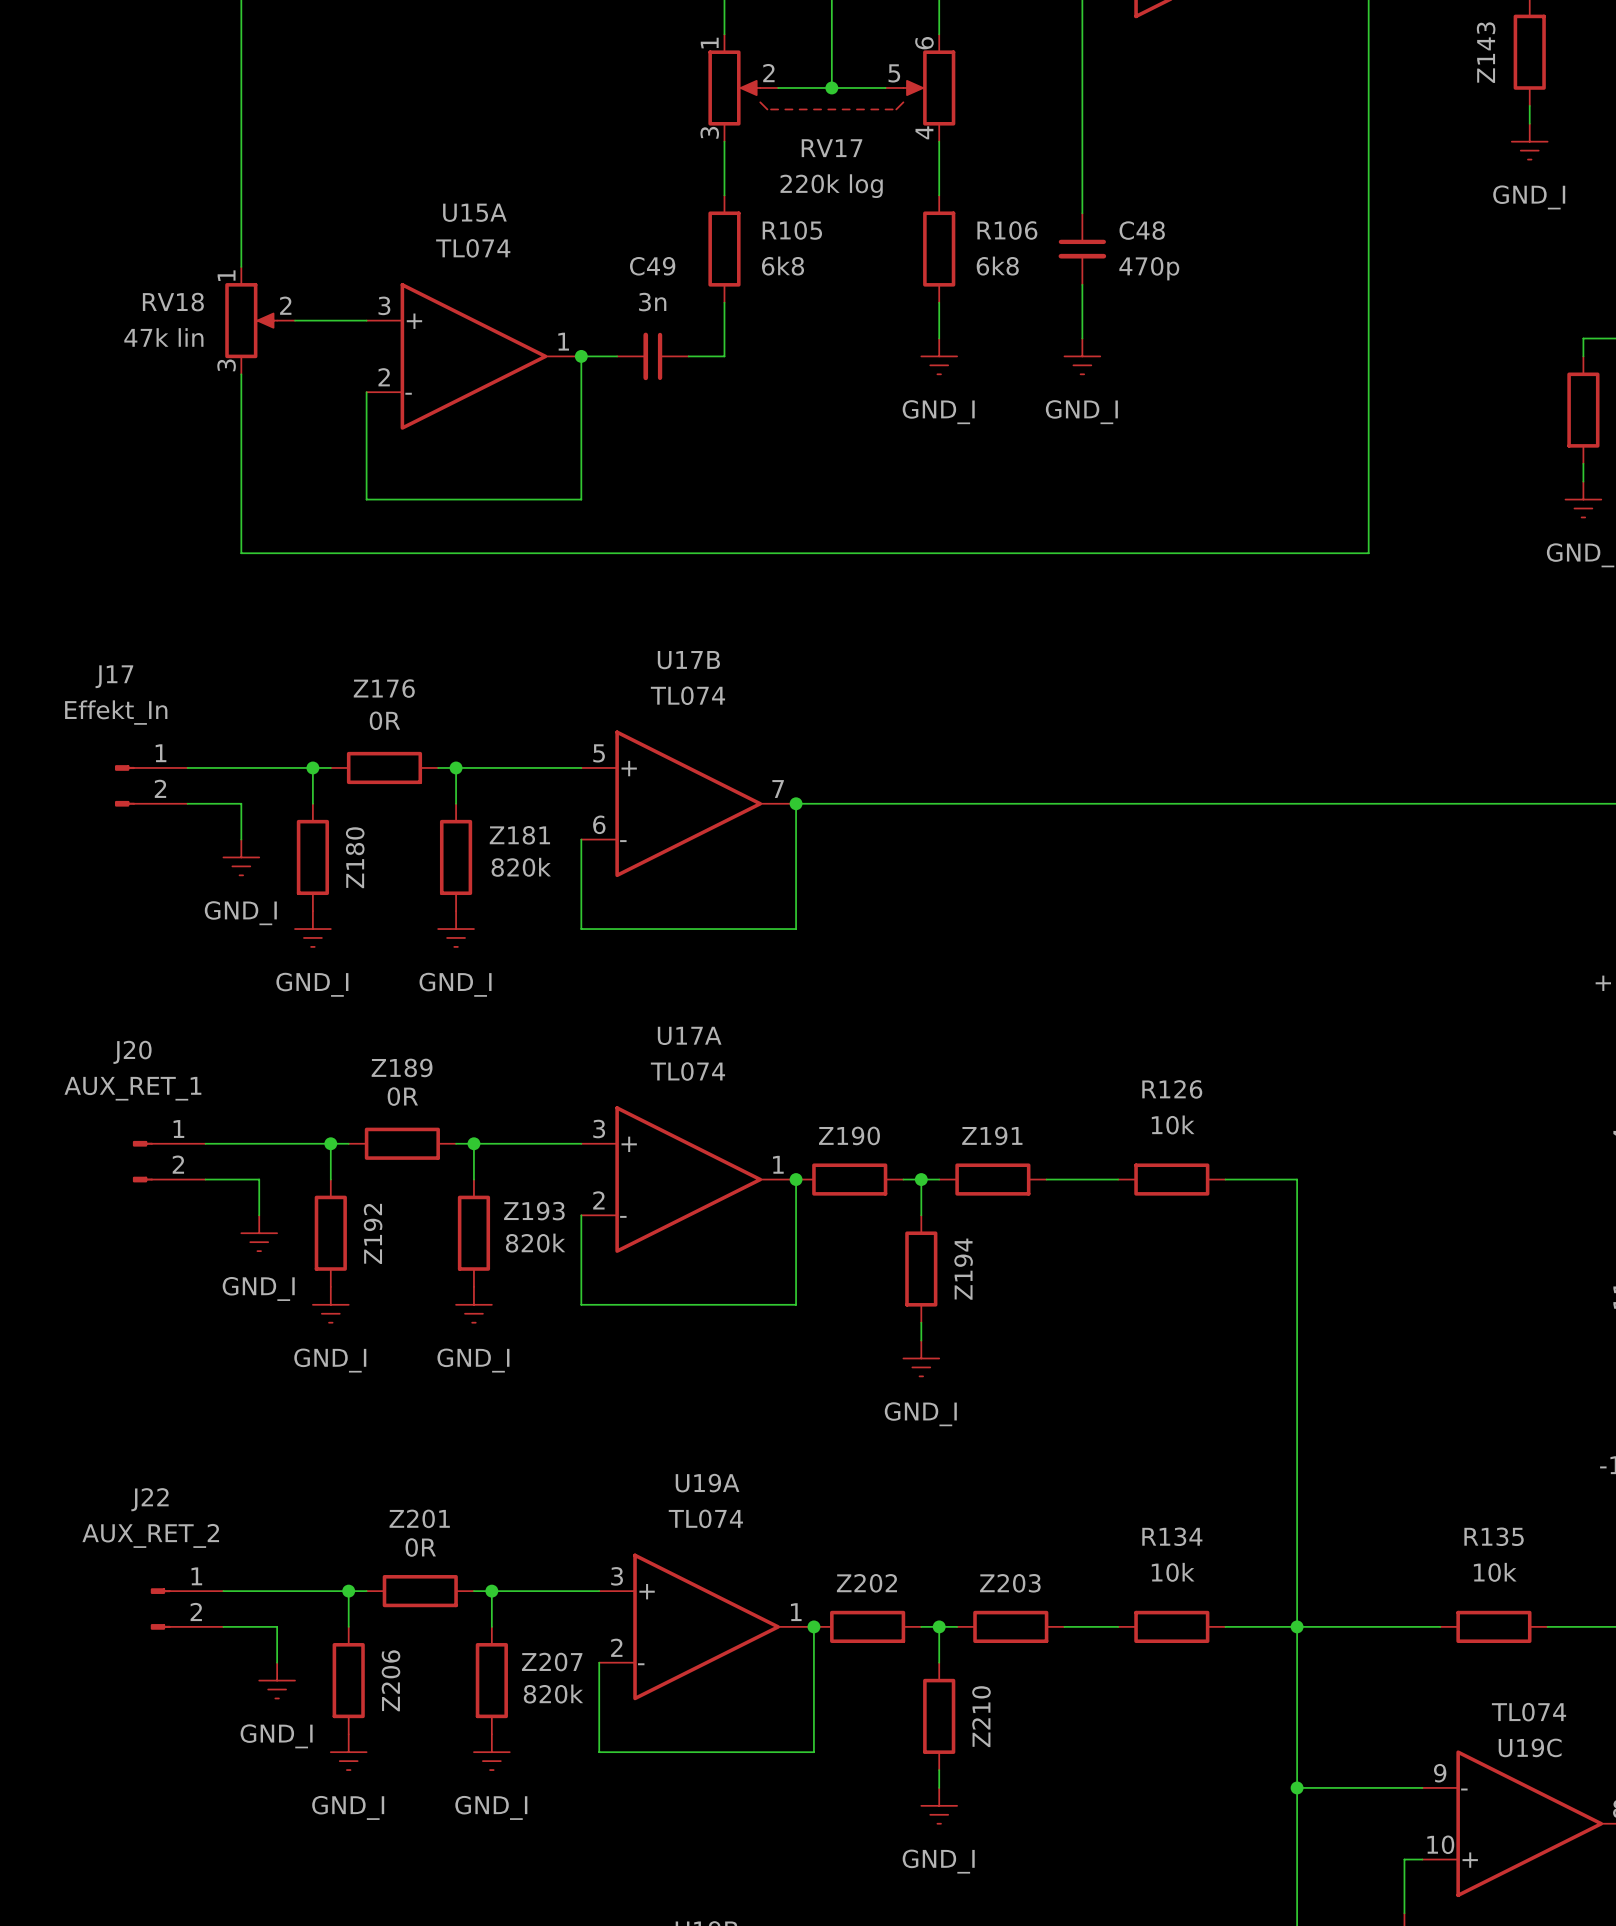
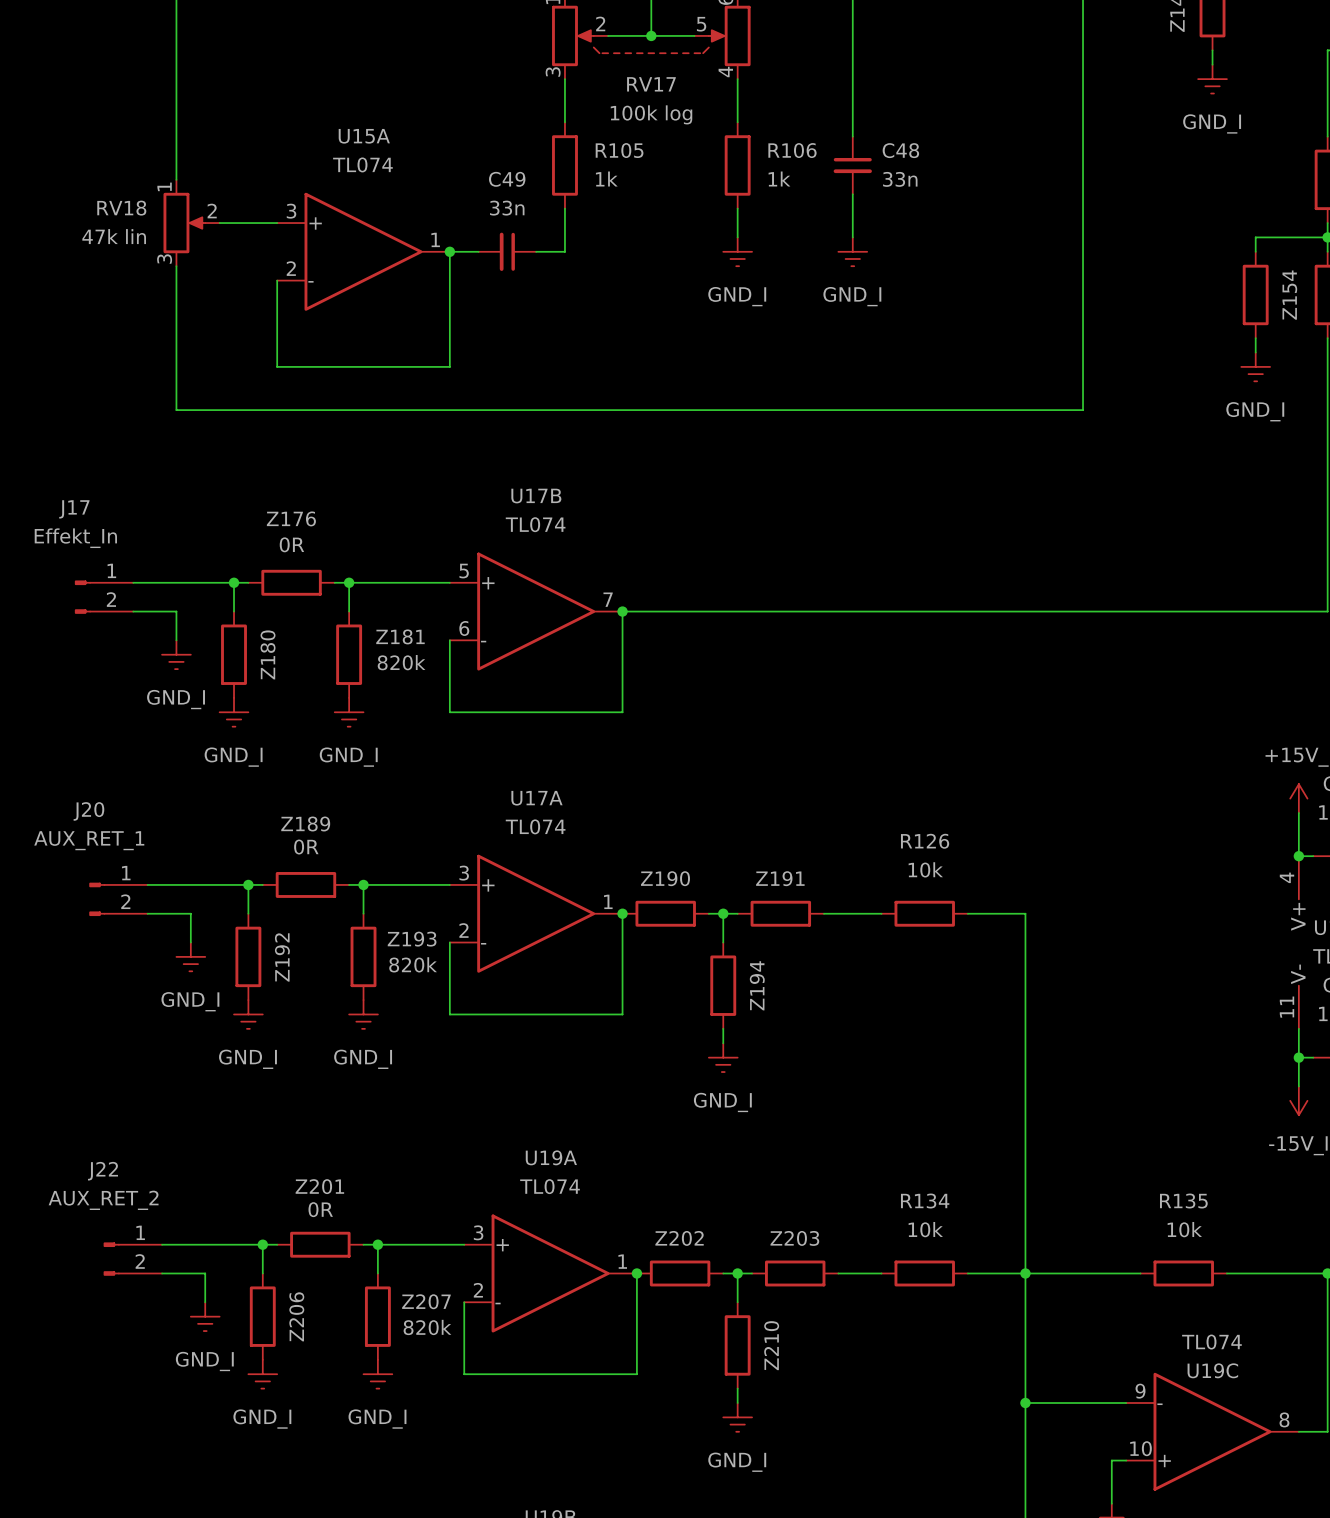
RV17 value: 220k log (831, 186) -> 100k log (651, 114)
R105 value: 6k8 (783, 266) -> 1k (606, 179)
R106 value: 6k8 (997, 266) -> 1k (779, 179)
C48 value: 470p (1149, 268) -> 33n (900, 179)
C49 value: 3n (652, 302) -> 33n (507, 208)

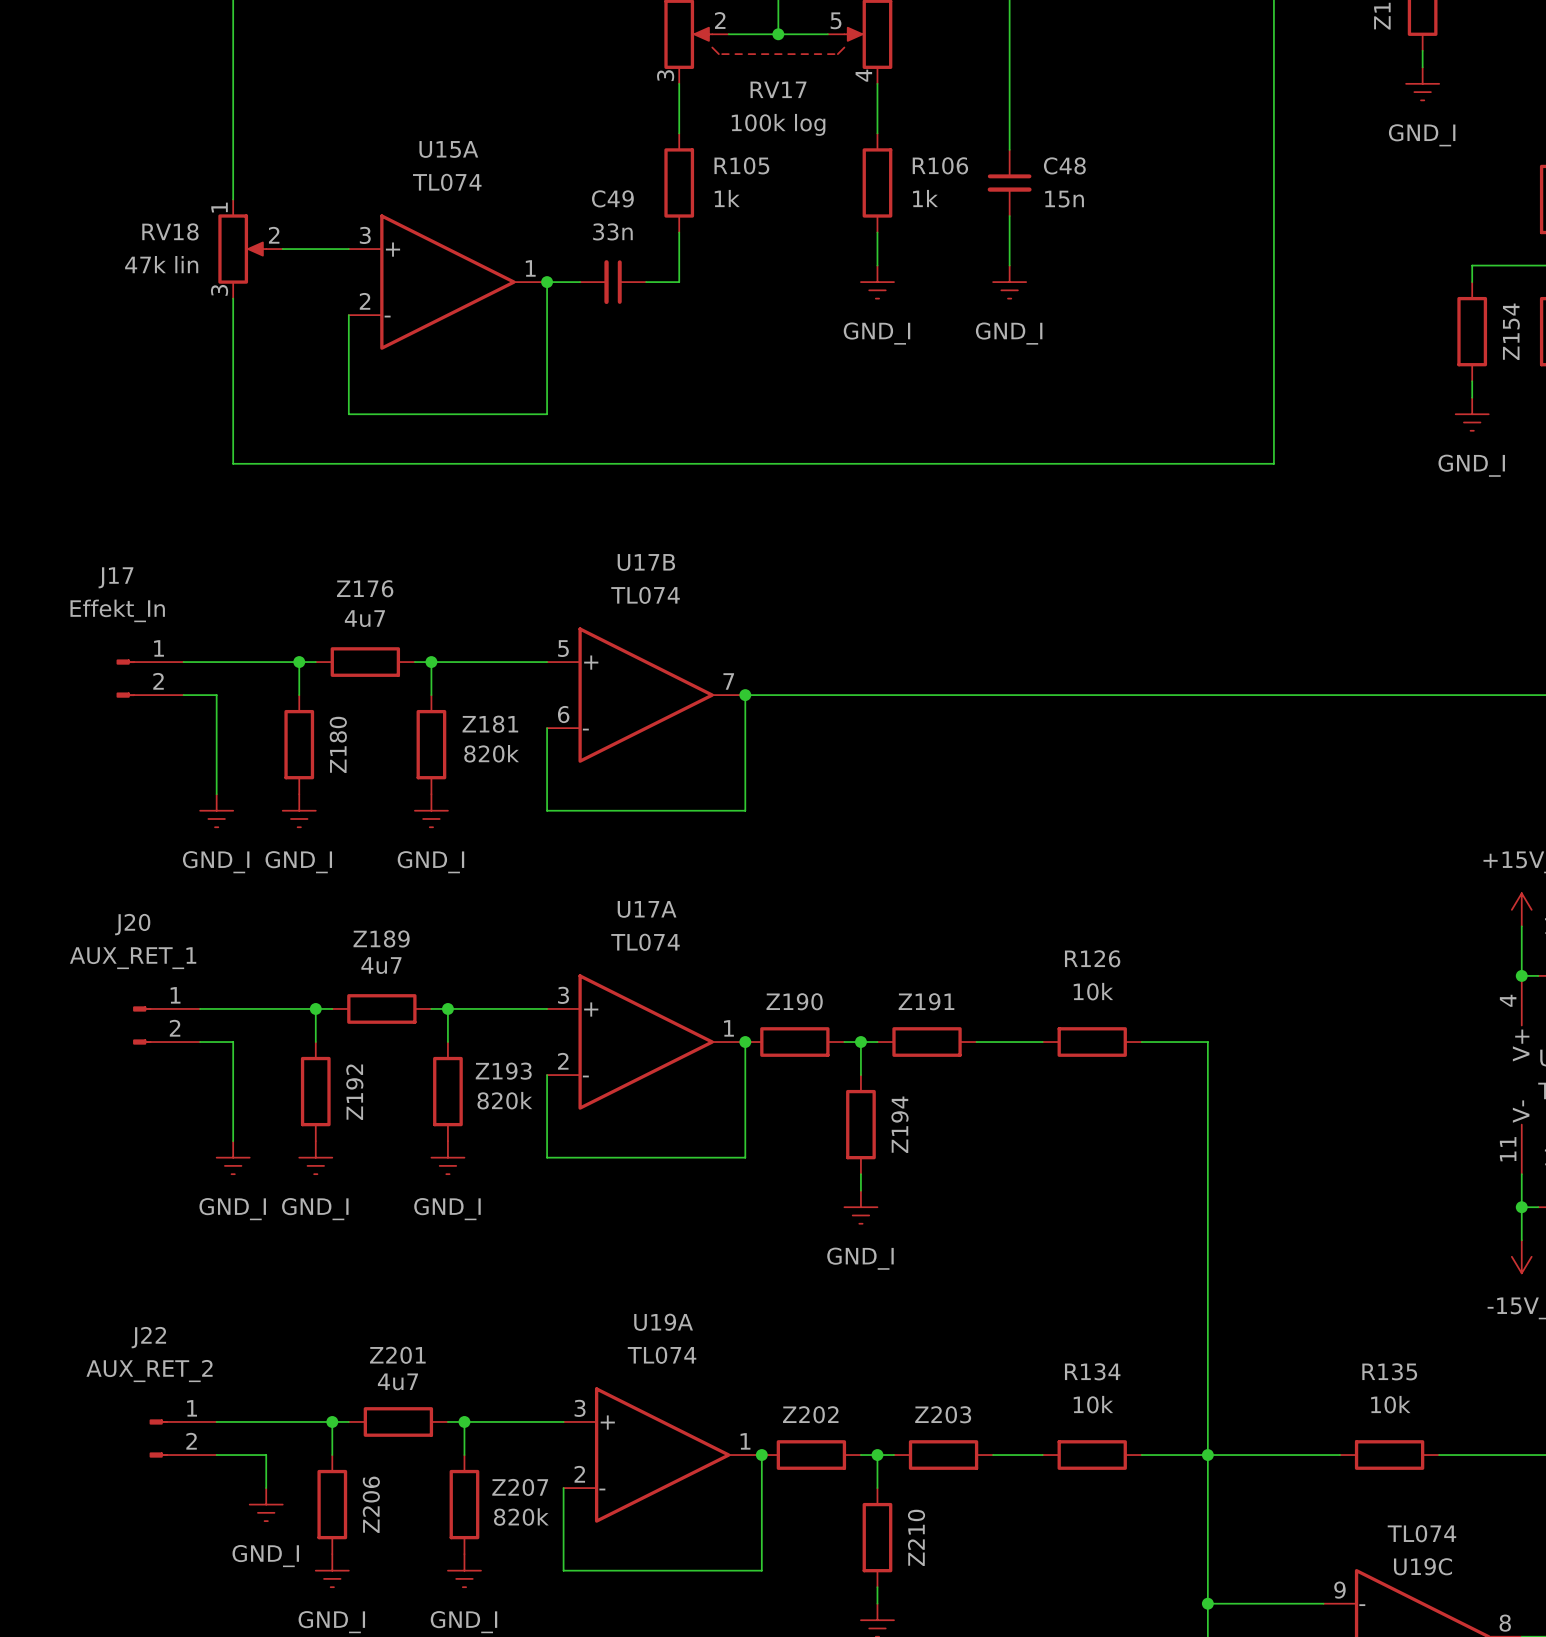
C48 value: 33n (900, 179) -> 15n (1064, 199)
Z176 value: 0R (291, 544) -> 4u7 (364, 618)
wire: (162, 611) (176, 611) (176, 640) -> (216, 695) (216, 794)
power symbol position: GND_I (176, 654) -> GND_I (216, 810)
Z189 value: 0R (306, 847) -> 4u7 (381, 965)
wire: (176, 913) (190, 913) (190, 942) -> (233, 1042) (233, 1141)
power symbol position: GND_I (190, 956) -> GND_I (233, 1157)
Z201 value: 0R (320, 1209) -> 4u7 (397, 1381)

